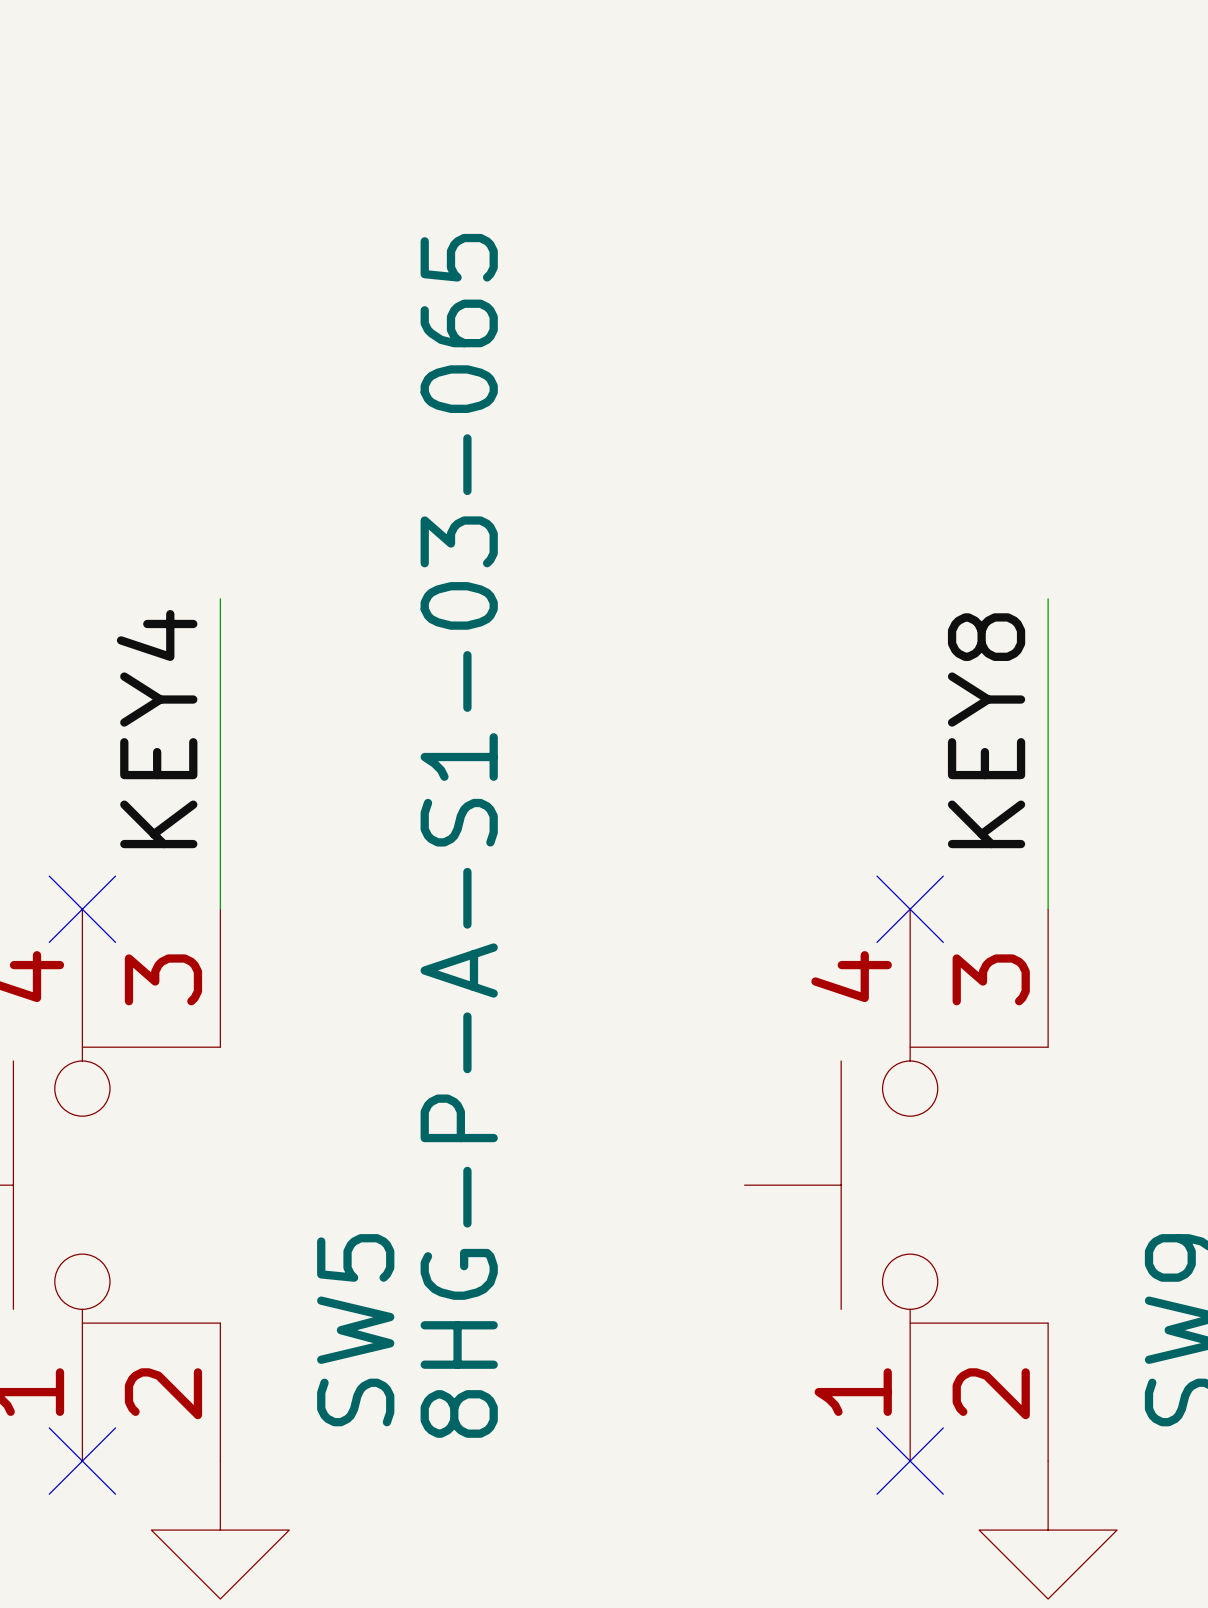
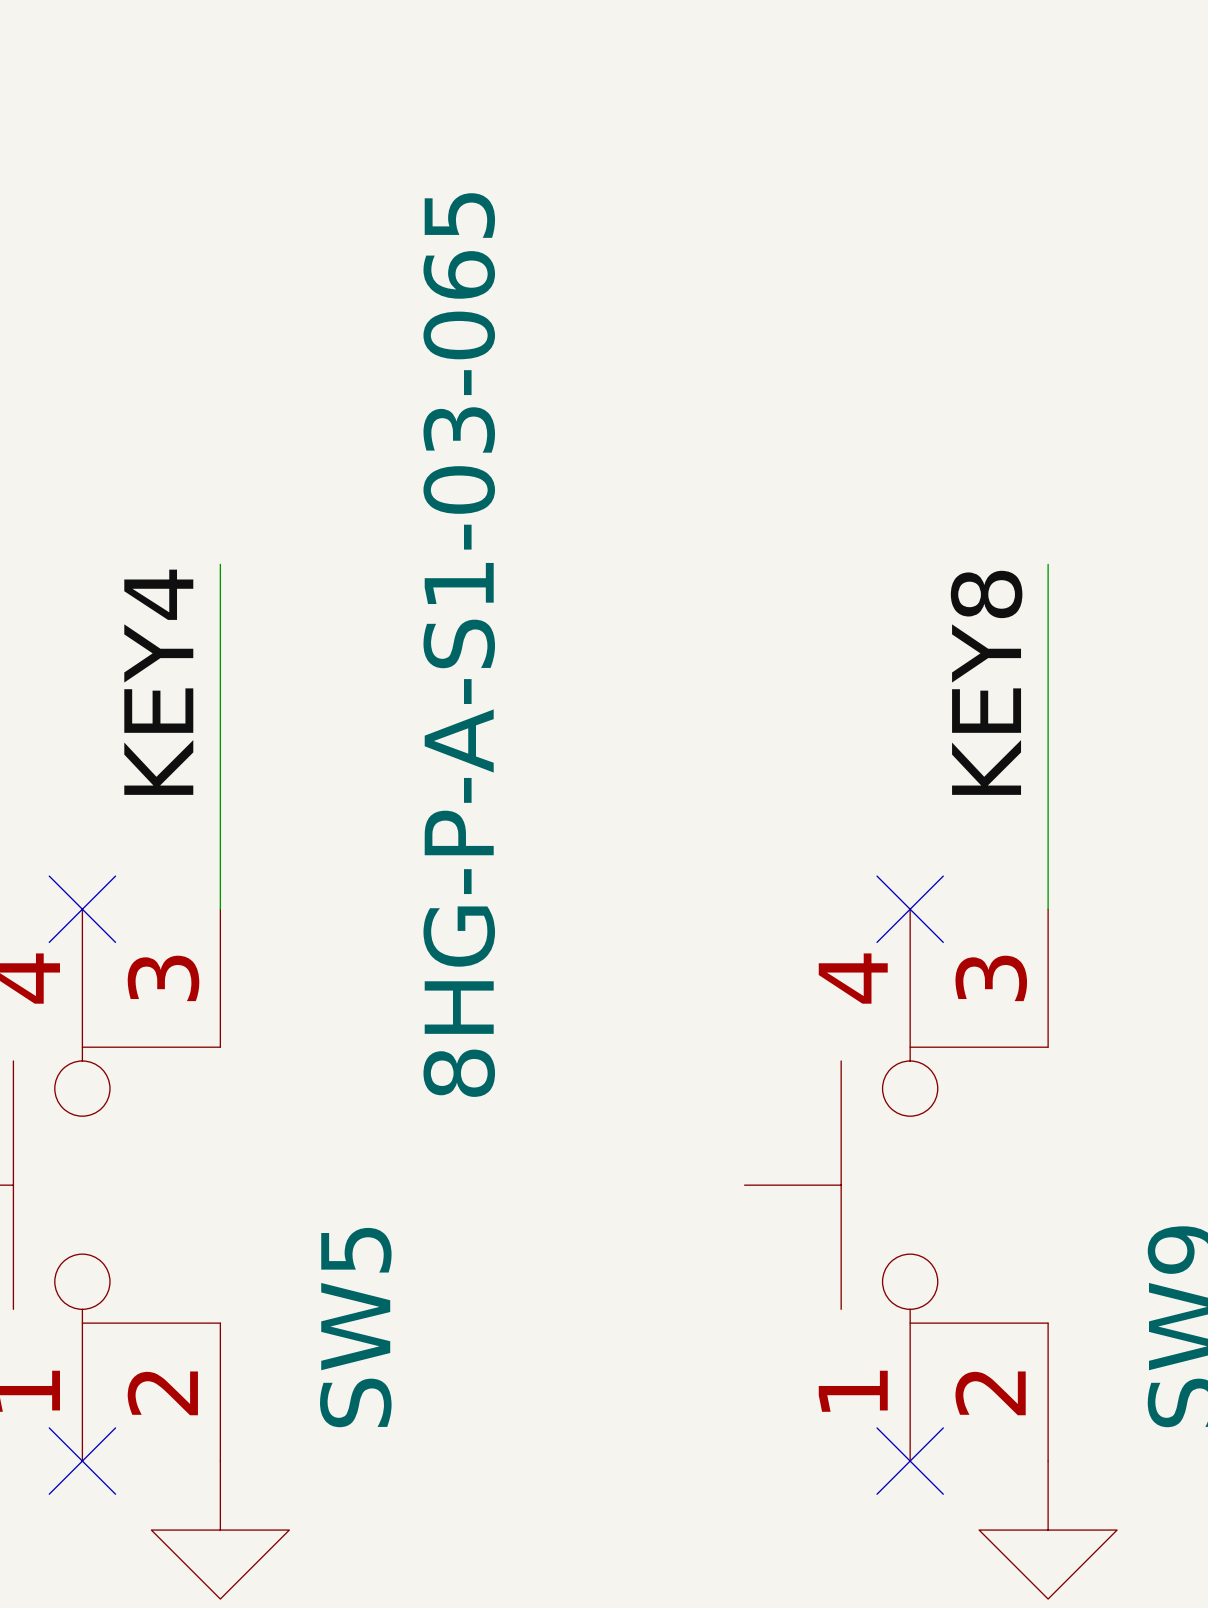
wire: none -> (220, 564) (220, 598)
wire: none -> (1048, 564) (1048, 598)
label position: KEY4 (157, 729) -> KEY4 (158, 682)
label position: KEY8 (986, 730) -> KEY8 (986, 682)
SW5 value position: 8HG-P-A-S1-03-065 (459, 835) -> 8HG-P-A-S1-03-065 (459, 645)

